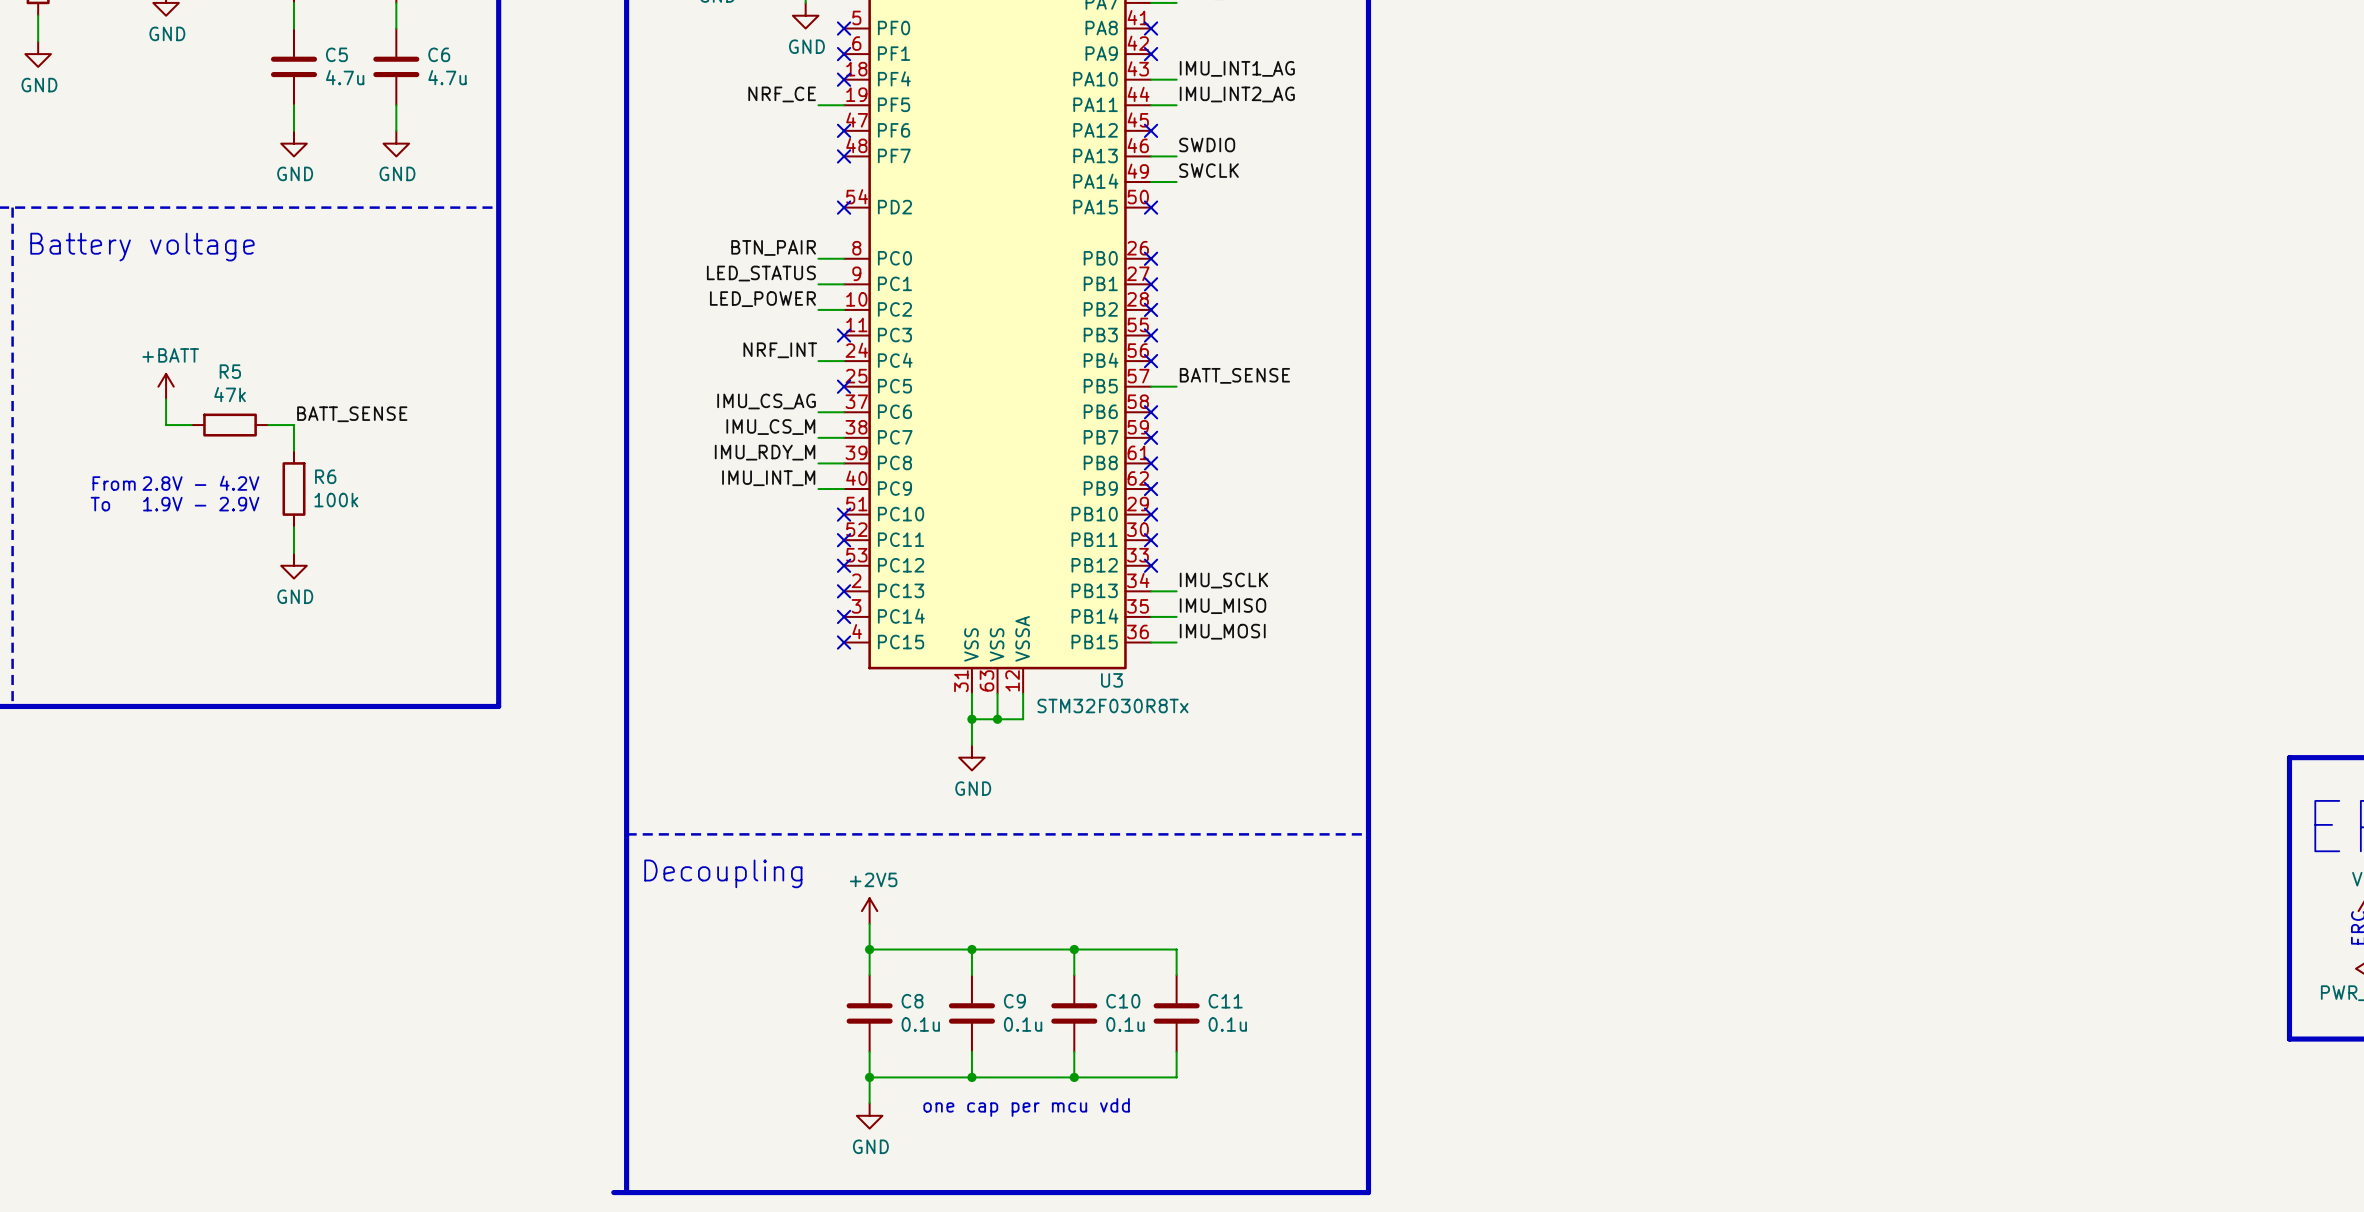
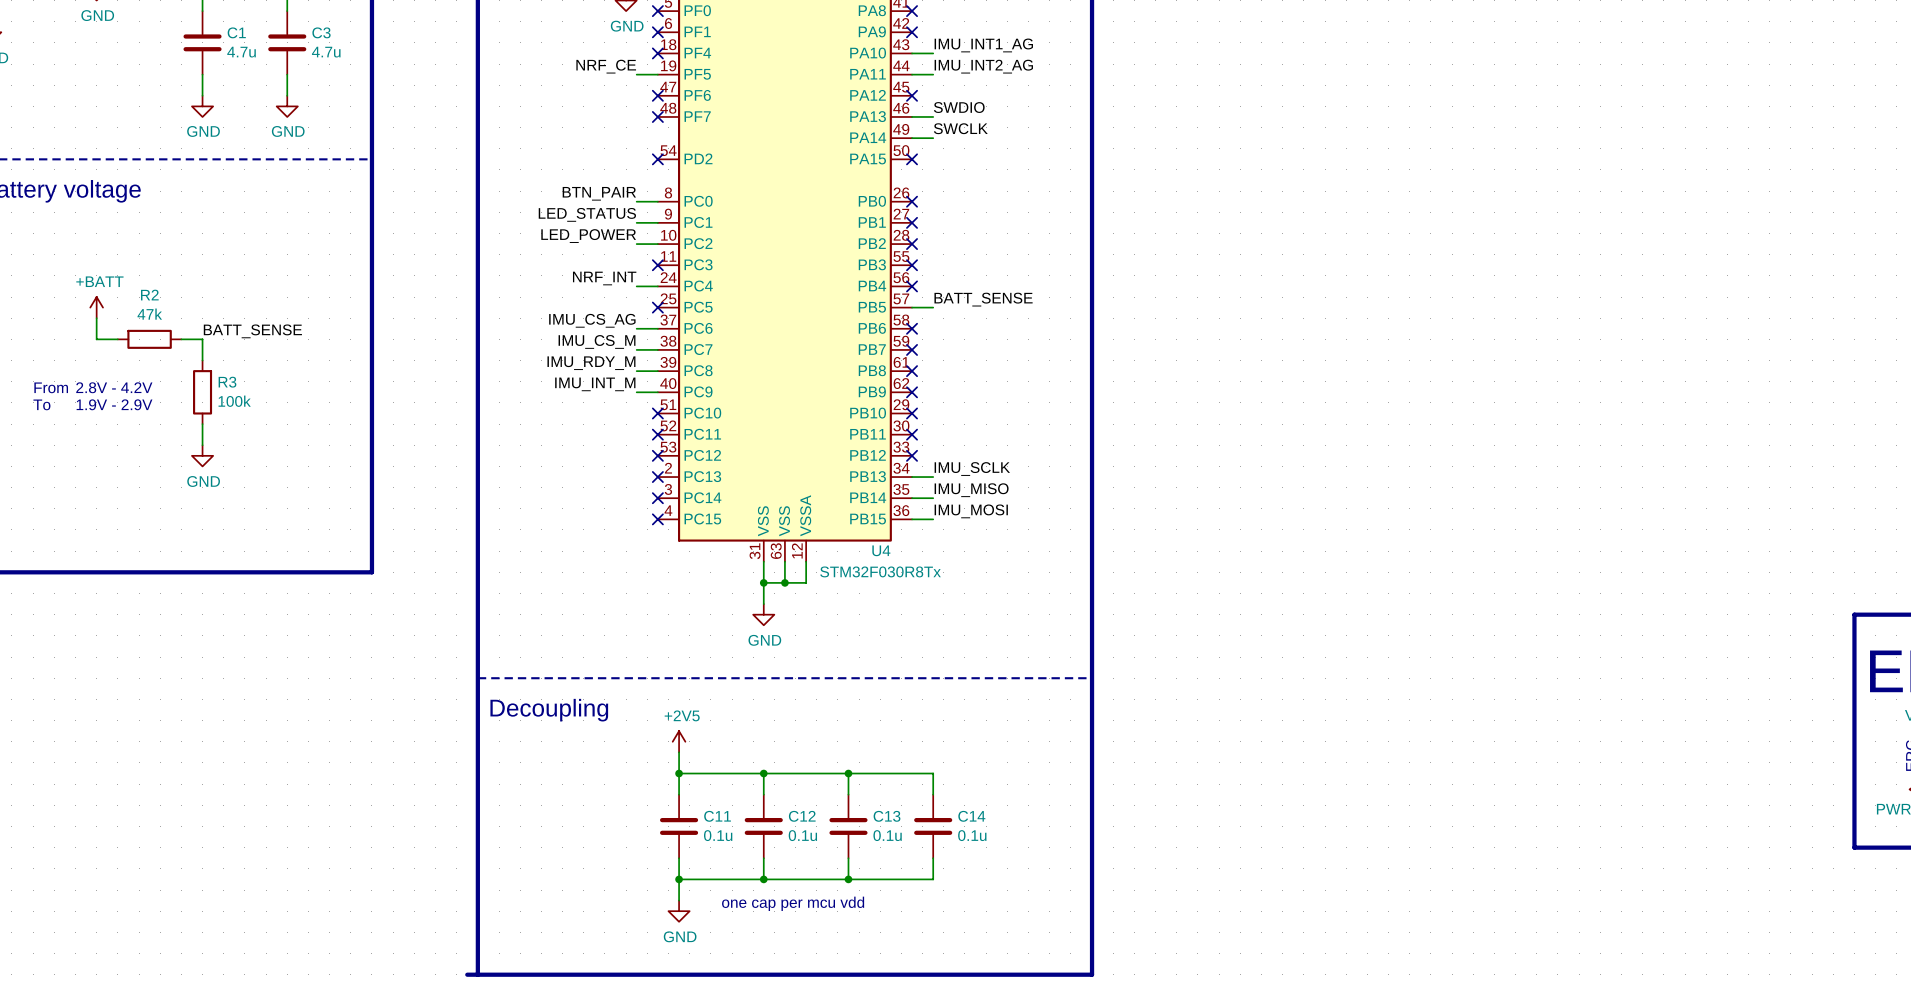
C5 name: C5 (336, 54) -> C1 (236, 32)
C6 name: C6 (439, 54) -> C3 (321, 32)
R5 name: R5 (230, 371) -> R2 (149, 295)
R6 name: R6 (325, 476) -> R3 (227, 382)
U3 name: U3 (1111, 680) -> U4 (881, 550)
C8 name: C8 (912, 1001) -> C11 (717, 816)
C9 name: C9 (1014, 1001) -> C12 (802, 816)
C10 name: C10 (1123, 1001) -> C13 (887, 816)
C11 name: C11 (1225, 1001) -> C14 (971, 816)

